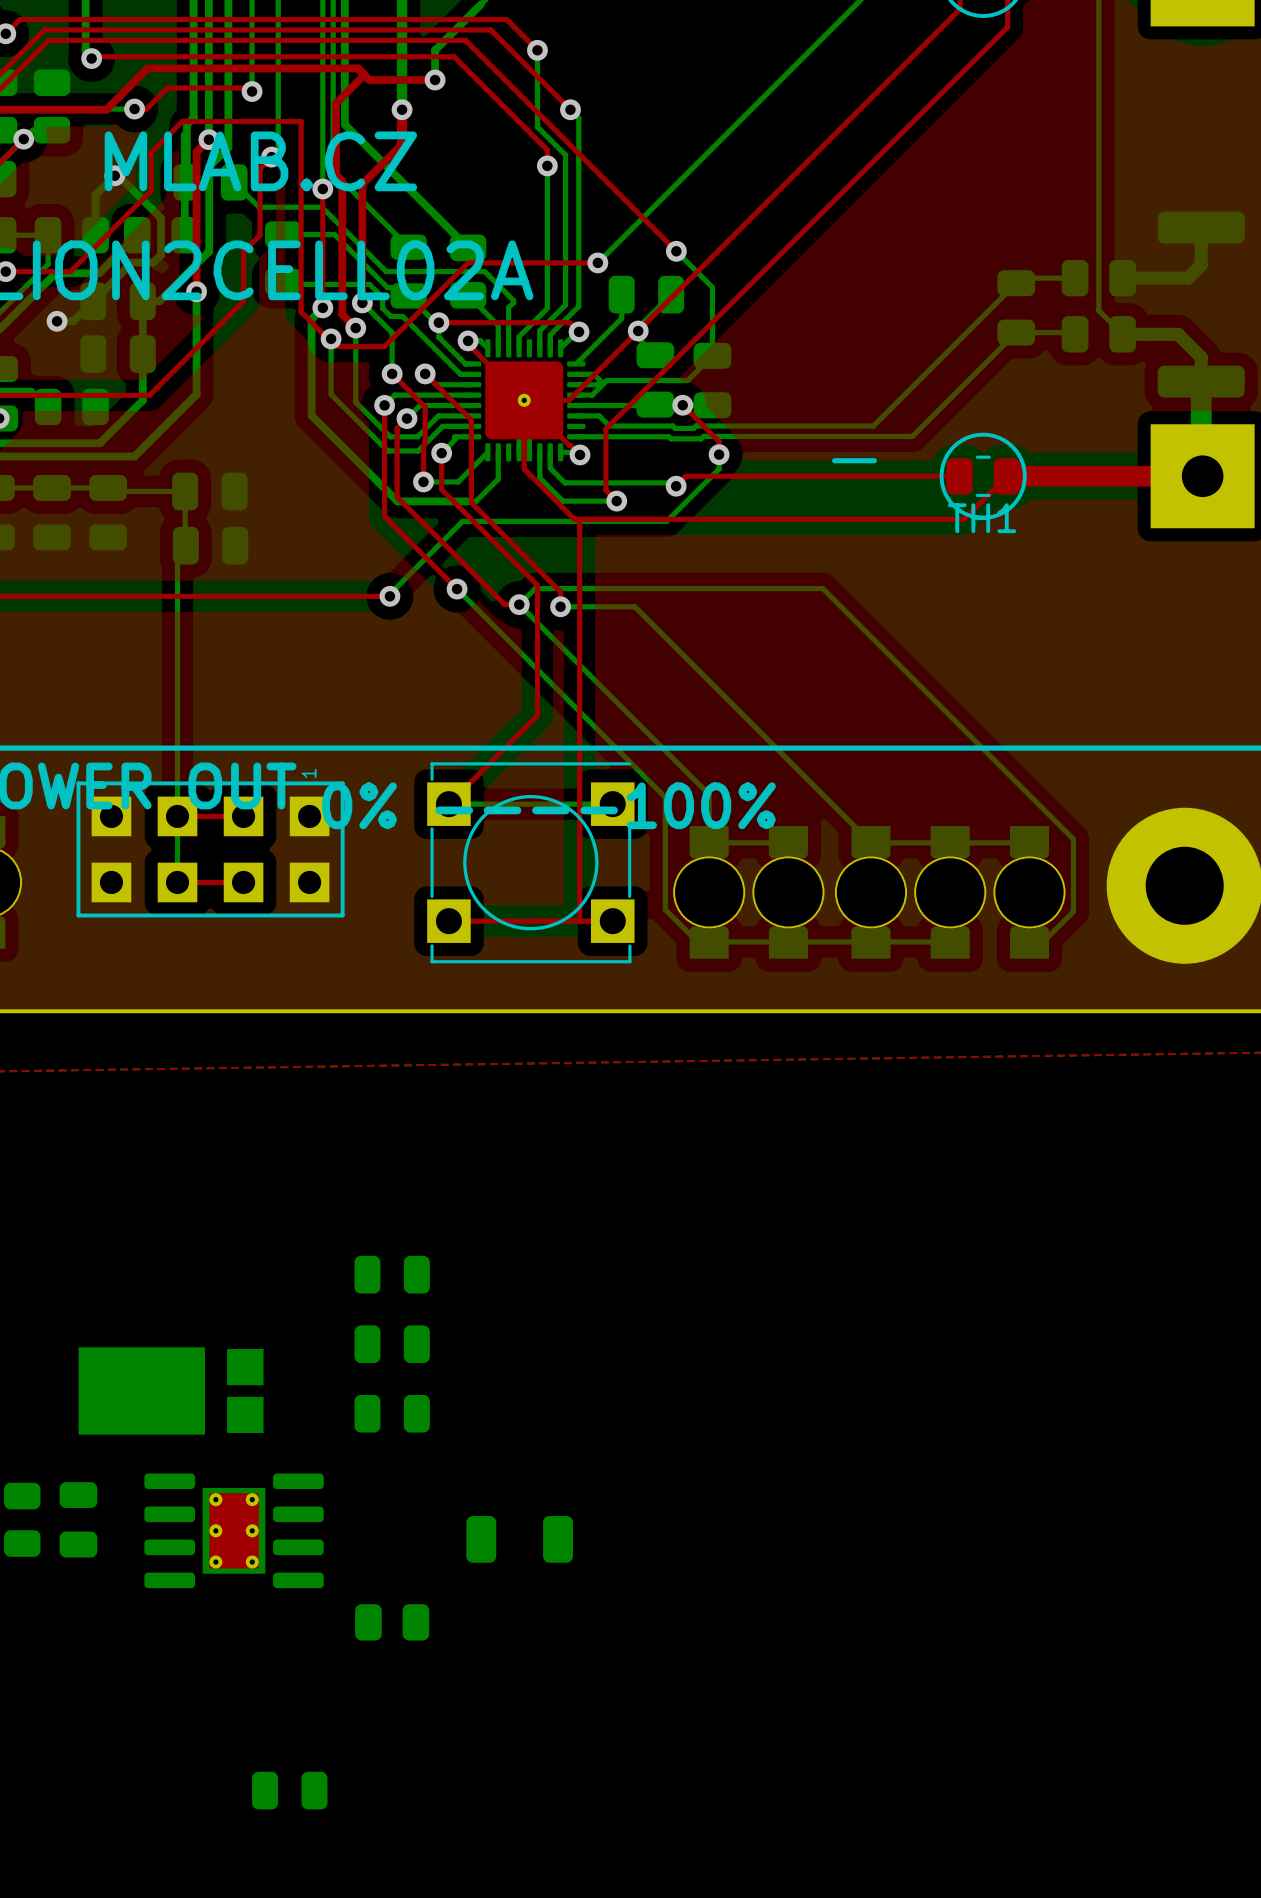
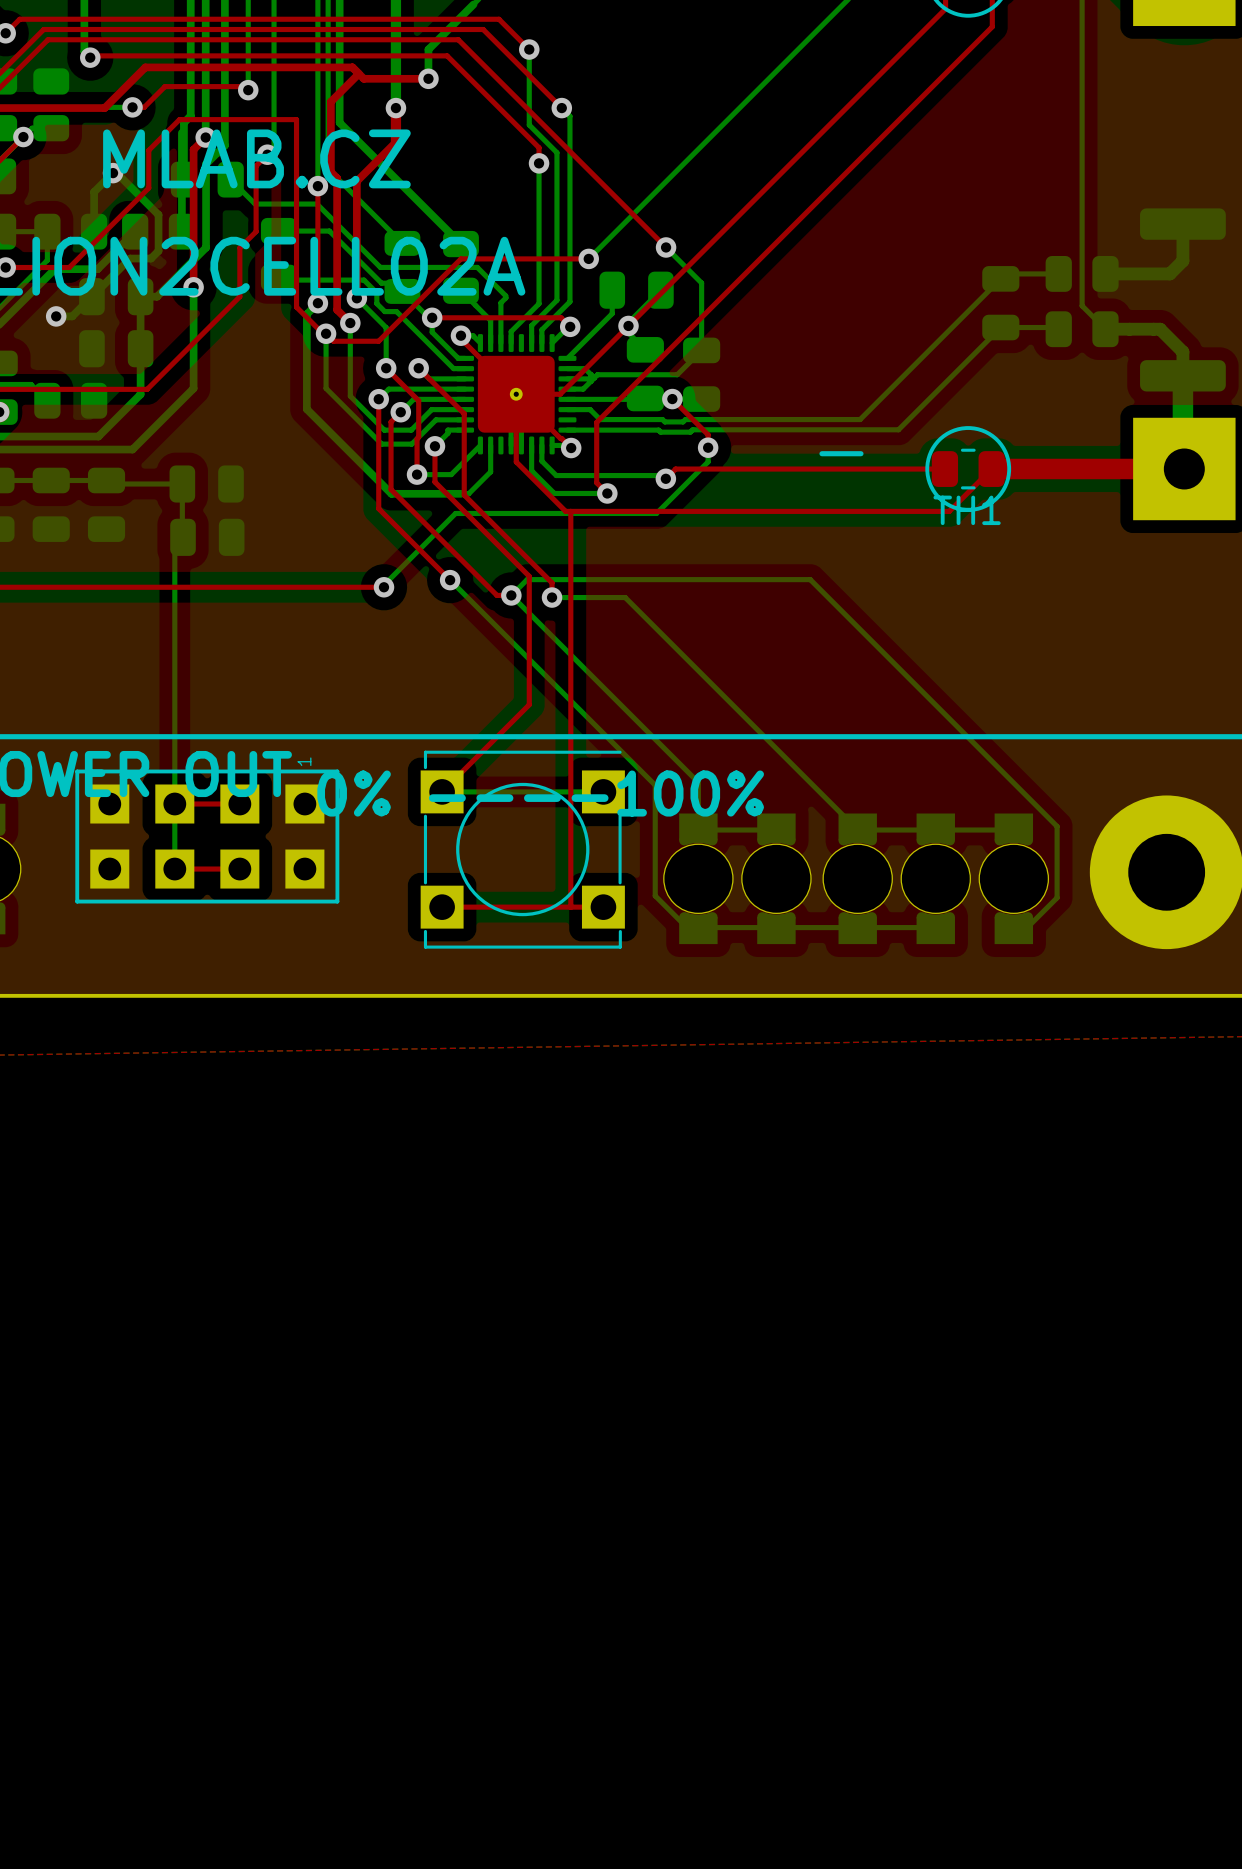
part: (392, 1274) -> none
part: (392, 1344) -> none
part: (171, 1391) -> none
part: (392, 1413) -> none
part: (22, 1519) -> none
part: (78, 1519) -> none
part: (234, 1530) -> none
part: (519, 1539) -> none
part: (392, 1622) -> none
part: (289, 1790) -> none

